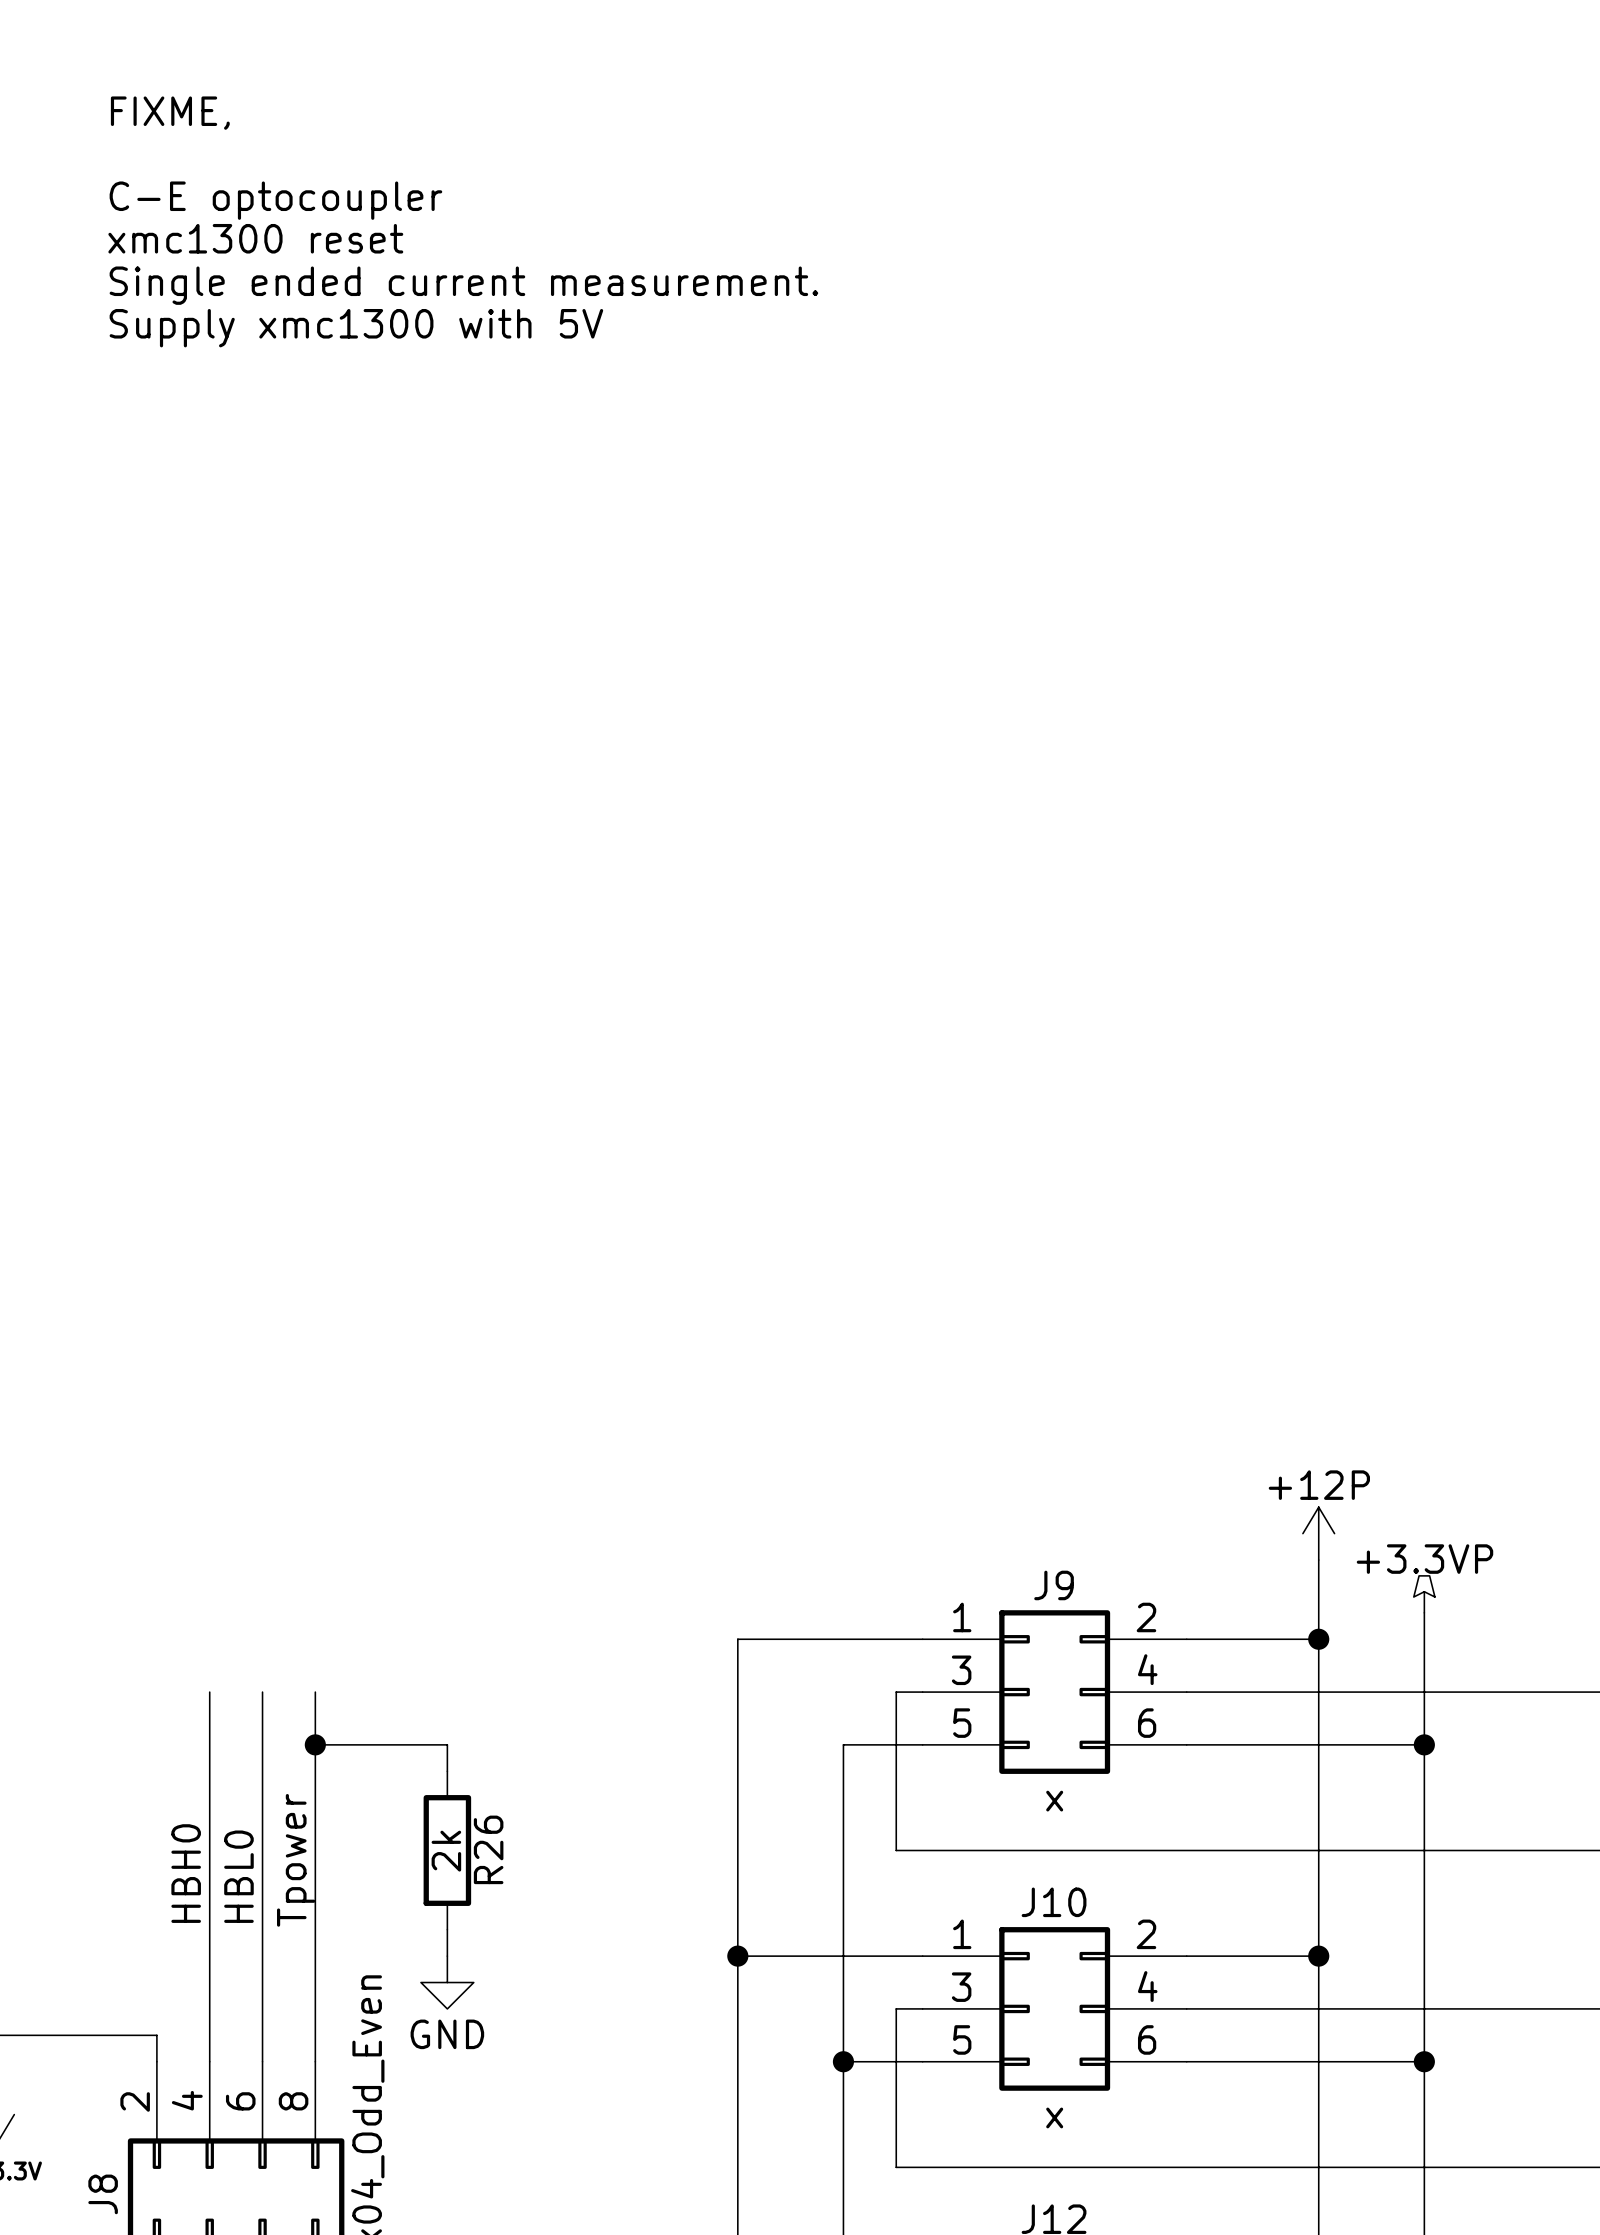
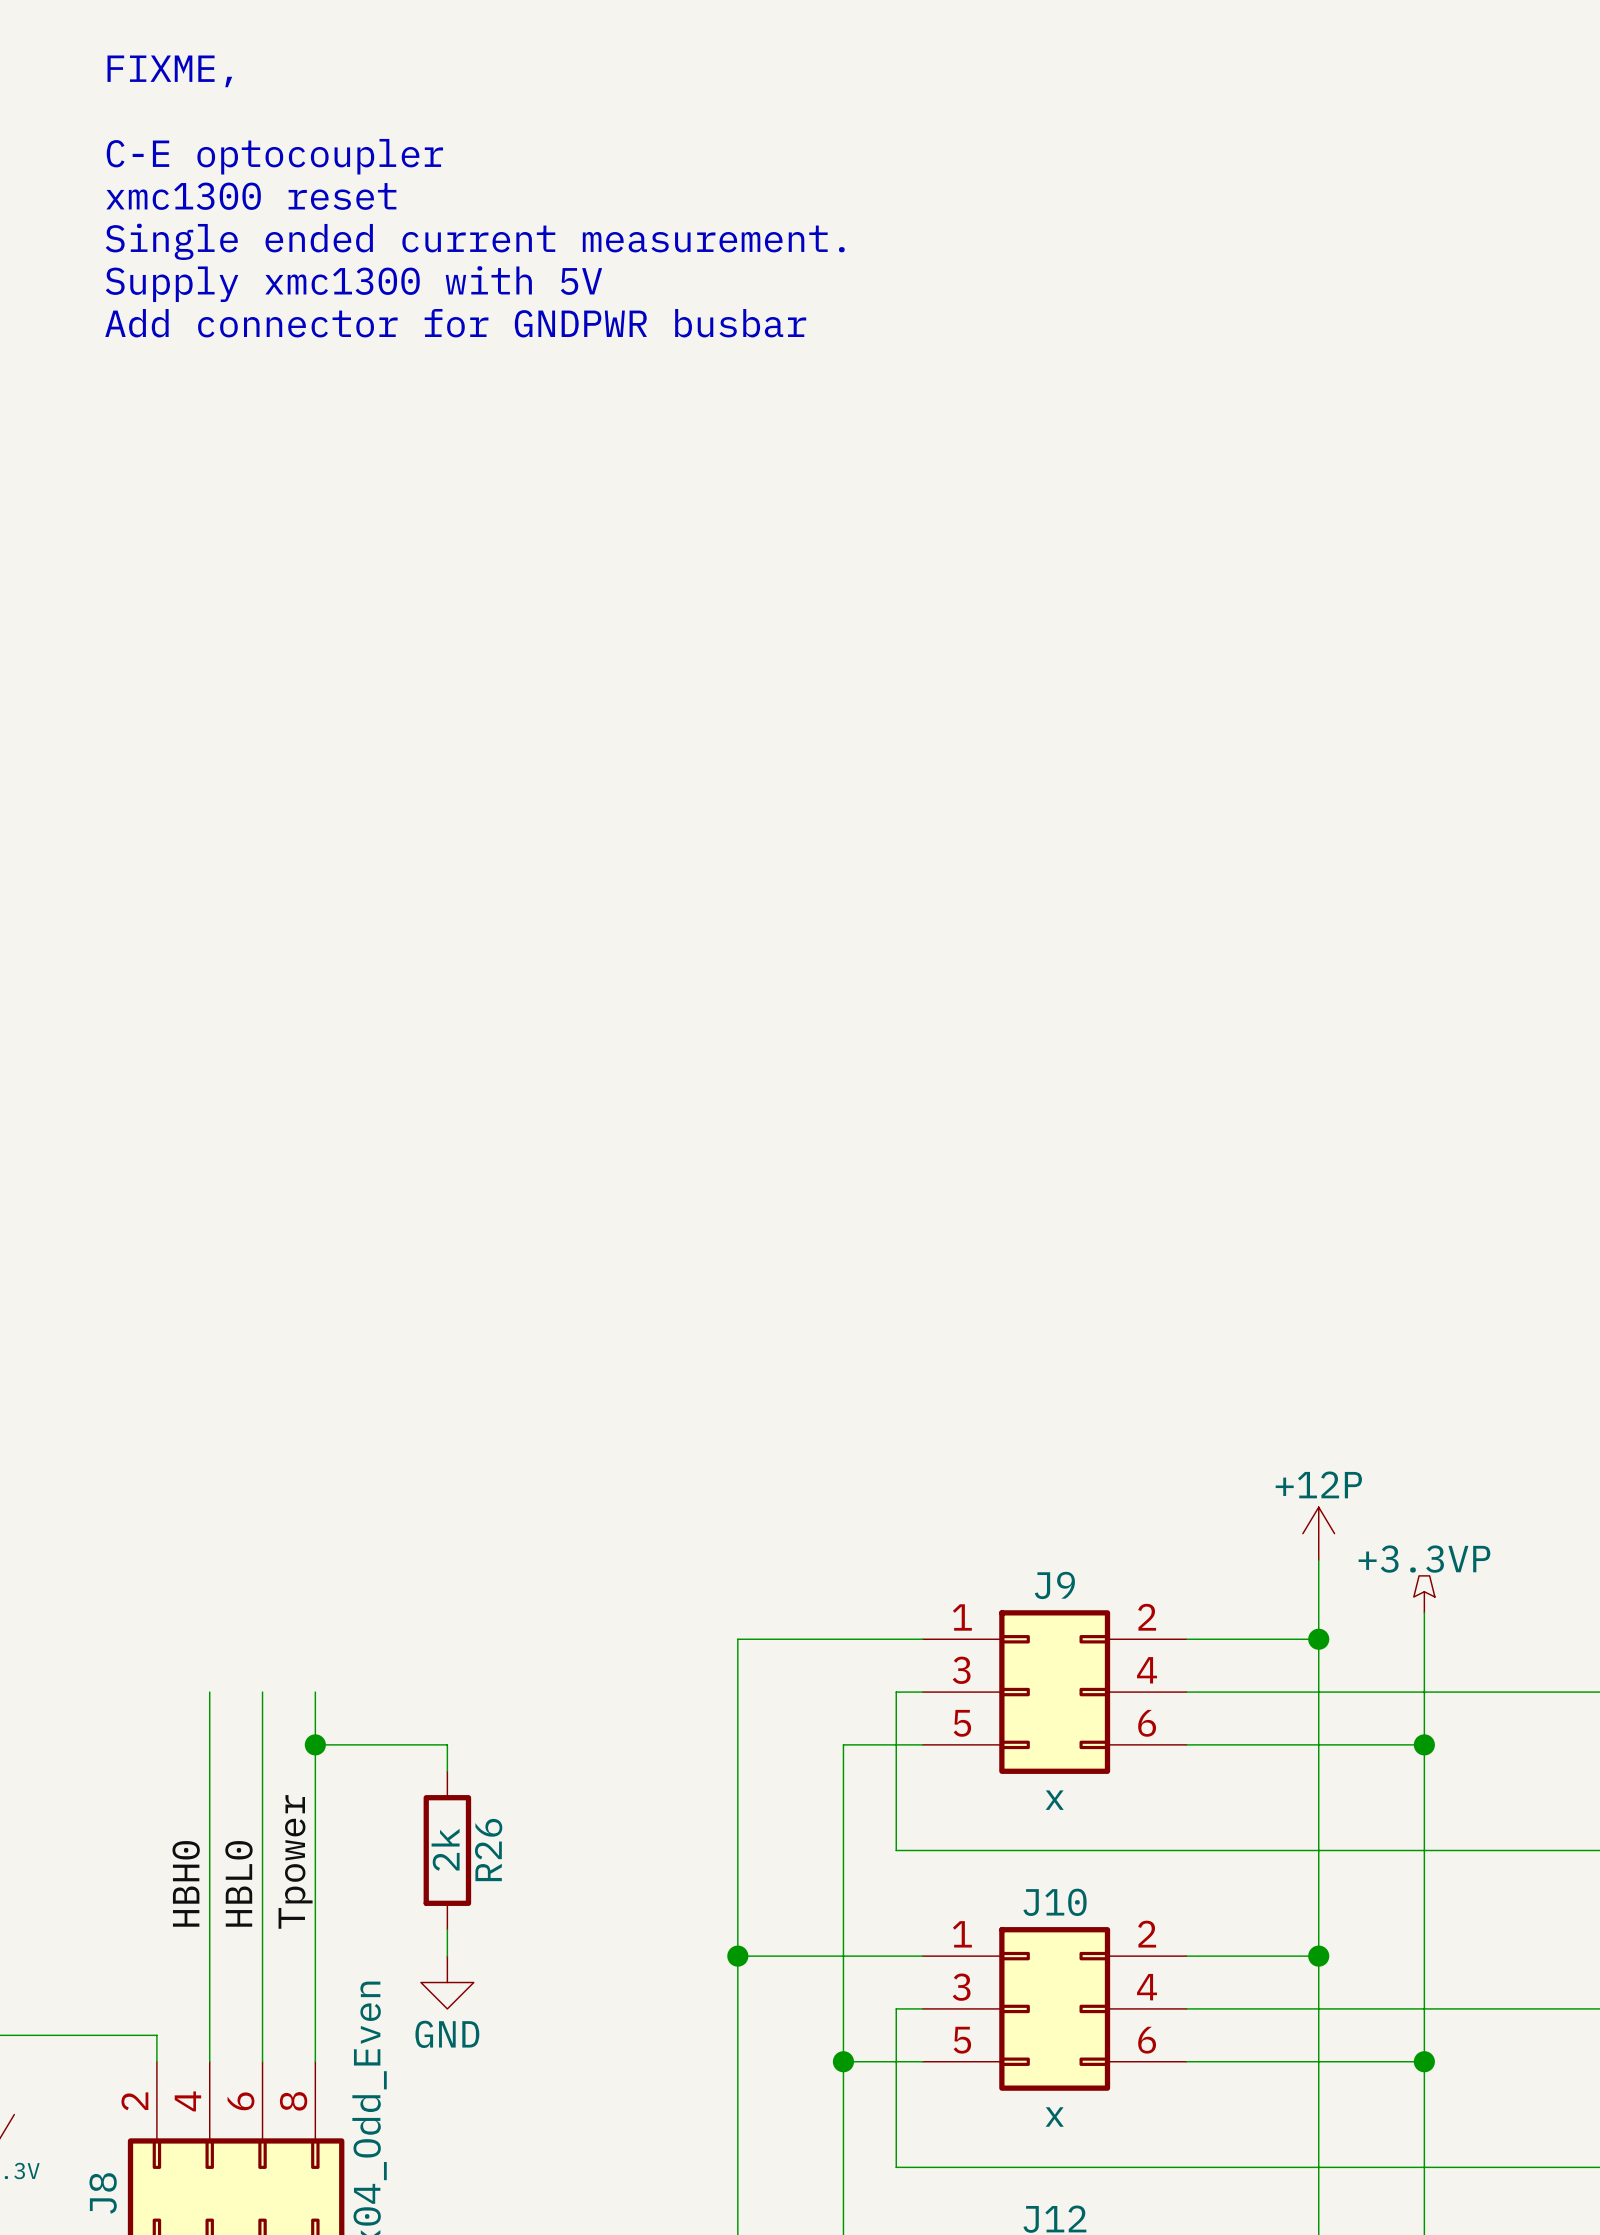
text position: FIXME, (170, 113) -> FIXME, (169, 71)
text: none -> C-E optocoupler (274, 156)
text: C-E optocoupler (275, 200) -> xmc1300 reset (251, 196)
text: xmc1300 reset (255, 238) -> Single ended current measurement. (475, 241)
text: Single ended current measurement. (463, 285) -> Supply xmc1300 with 5V (353, 284)
text: Supply xmc1300 with 5V (356, 328) -> Add connector for GNDPWR busbar (455, 323)

